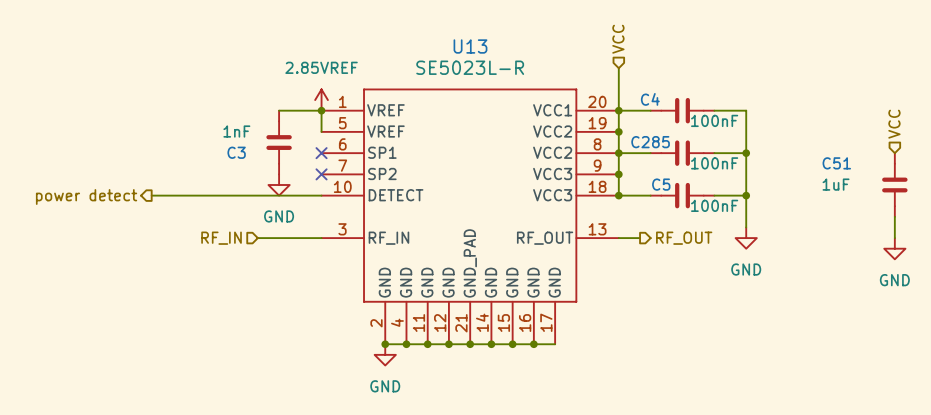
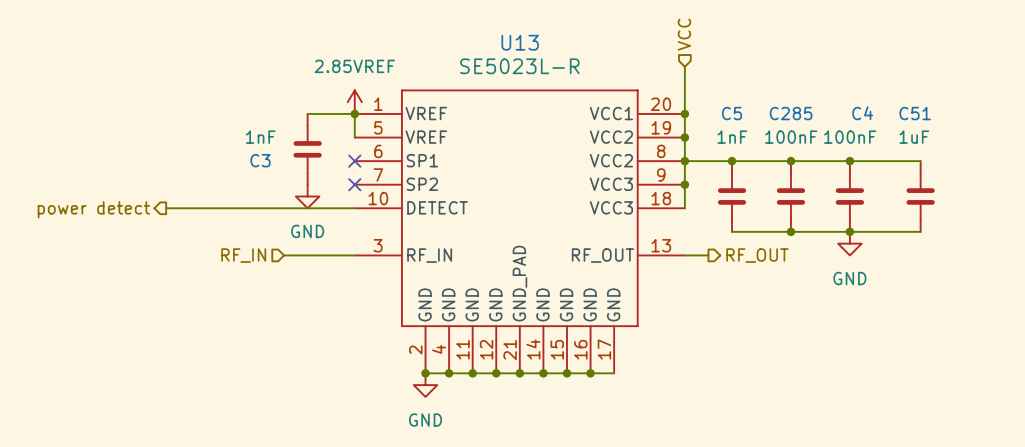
C4 name position: C4 (650, 99) -> C4 (862, 113)
wire: (618, 110) (650, 110) -> none
C4 rotation: 0° (682, 110) -> 90° clockwise (849, 196)
C4 position: (682, 110) -> (849, 196)
wire: (714, 110) (746, 110) (746, 227) -> none
C4 value position: 100nF (714, 120) -> 100nF (850, 137)
hierarchical label: VCC (894, 124) -> none
C285 name position: C285 (650, 142) -> C285 (791, 113)
junction: none -> (732, 161)
C285 rotation: 0° (682, 153) -> 90° clockwise (790, 196)
C285 position: (682, 153) -> (790, 196)
junction: none -> (790, 161)
wire: none -> (826, 161) (920, 161)
junction: (746, 153) -> none
junction: none -> (849, 161)
C285 value position: 100nF (714, 163) -> 100nF (791, 137)
C51 name position: C51 (836, 163) -> C51 (915, 113)
C5 name position: C5 (661, 184) -> C5 (732, 113)
C51 value position: 1uF (836, 184) -> 1uF (914, 137)
C51 position: (894, 185) -> (920, 196)
wire: (618, 195) (650, 195) -> none
junction: (618, 195) -> none
C5 rotation: 0° (682, 195) -> 90° clockwise (732, 196)
wire: (714, 195) (746, 195) -> none
junction: (746, 195) -> none
C5 value: 100nF (714, 205) -> 1nF (732, 137)
wire: none -> (732, 231) (920, 231)
junction: none -> (790, 231)
junction: none -> (849, 231)
wire: (894, 216) (894, 238) -> none
power symbol position: GND (746, 238) -> GND (849, 243)
power symbol: GND (894, 248) -> none

